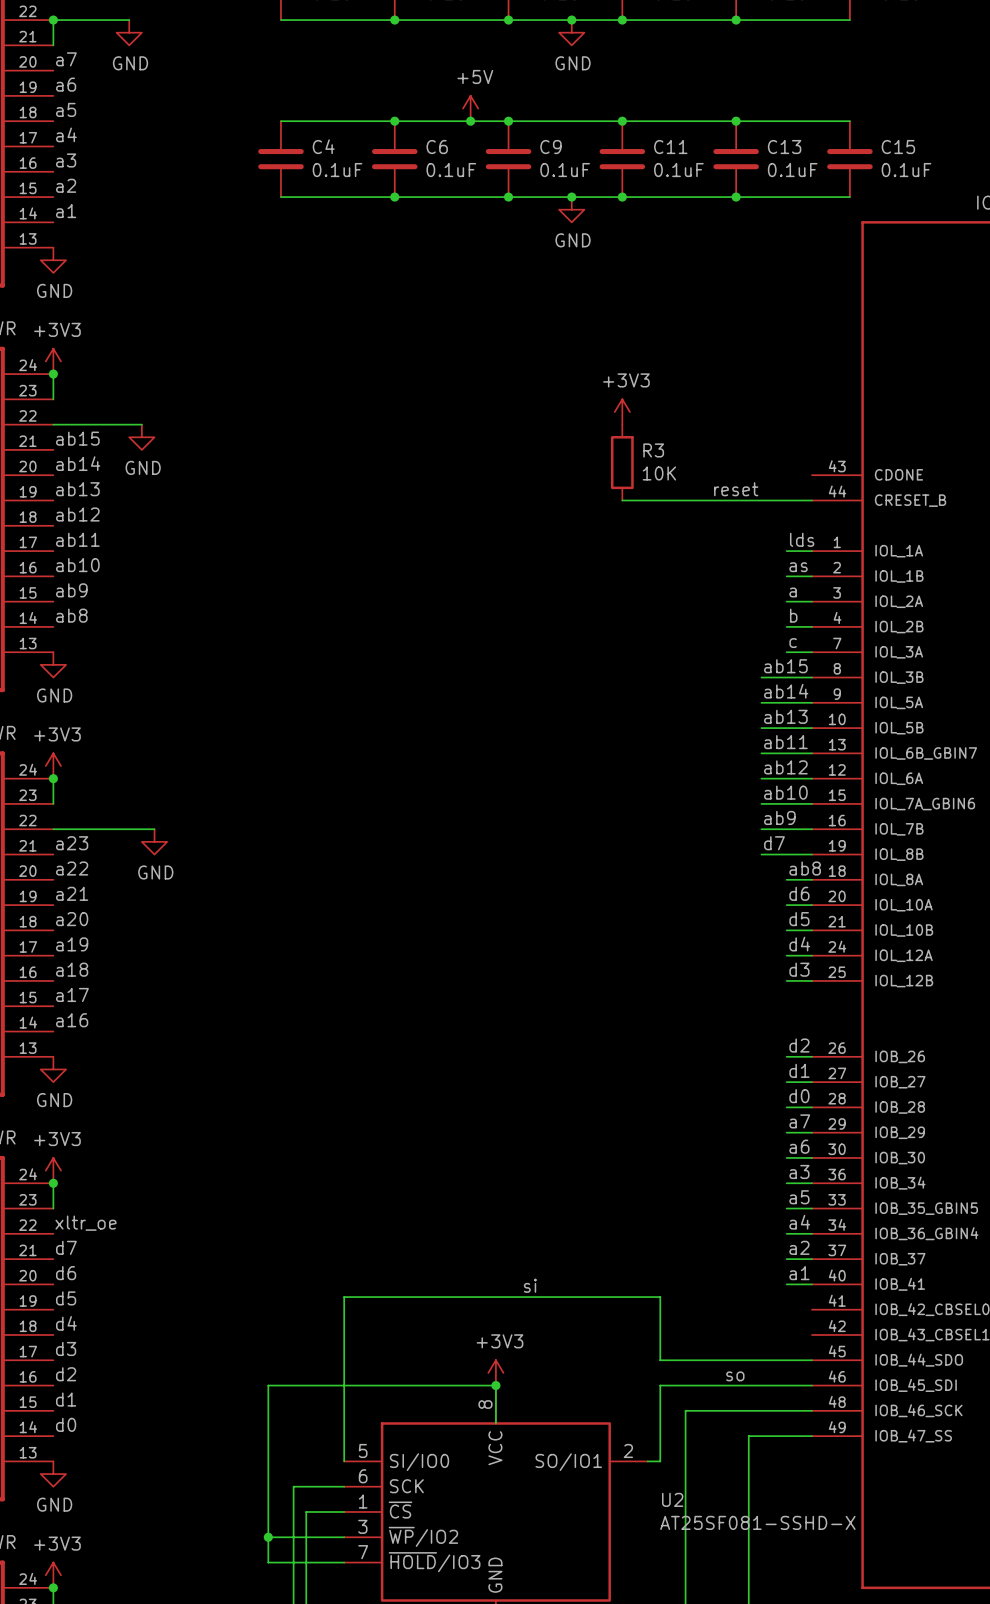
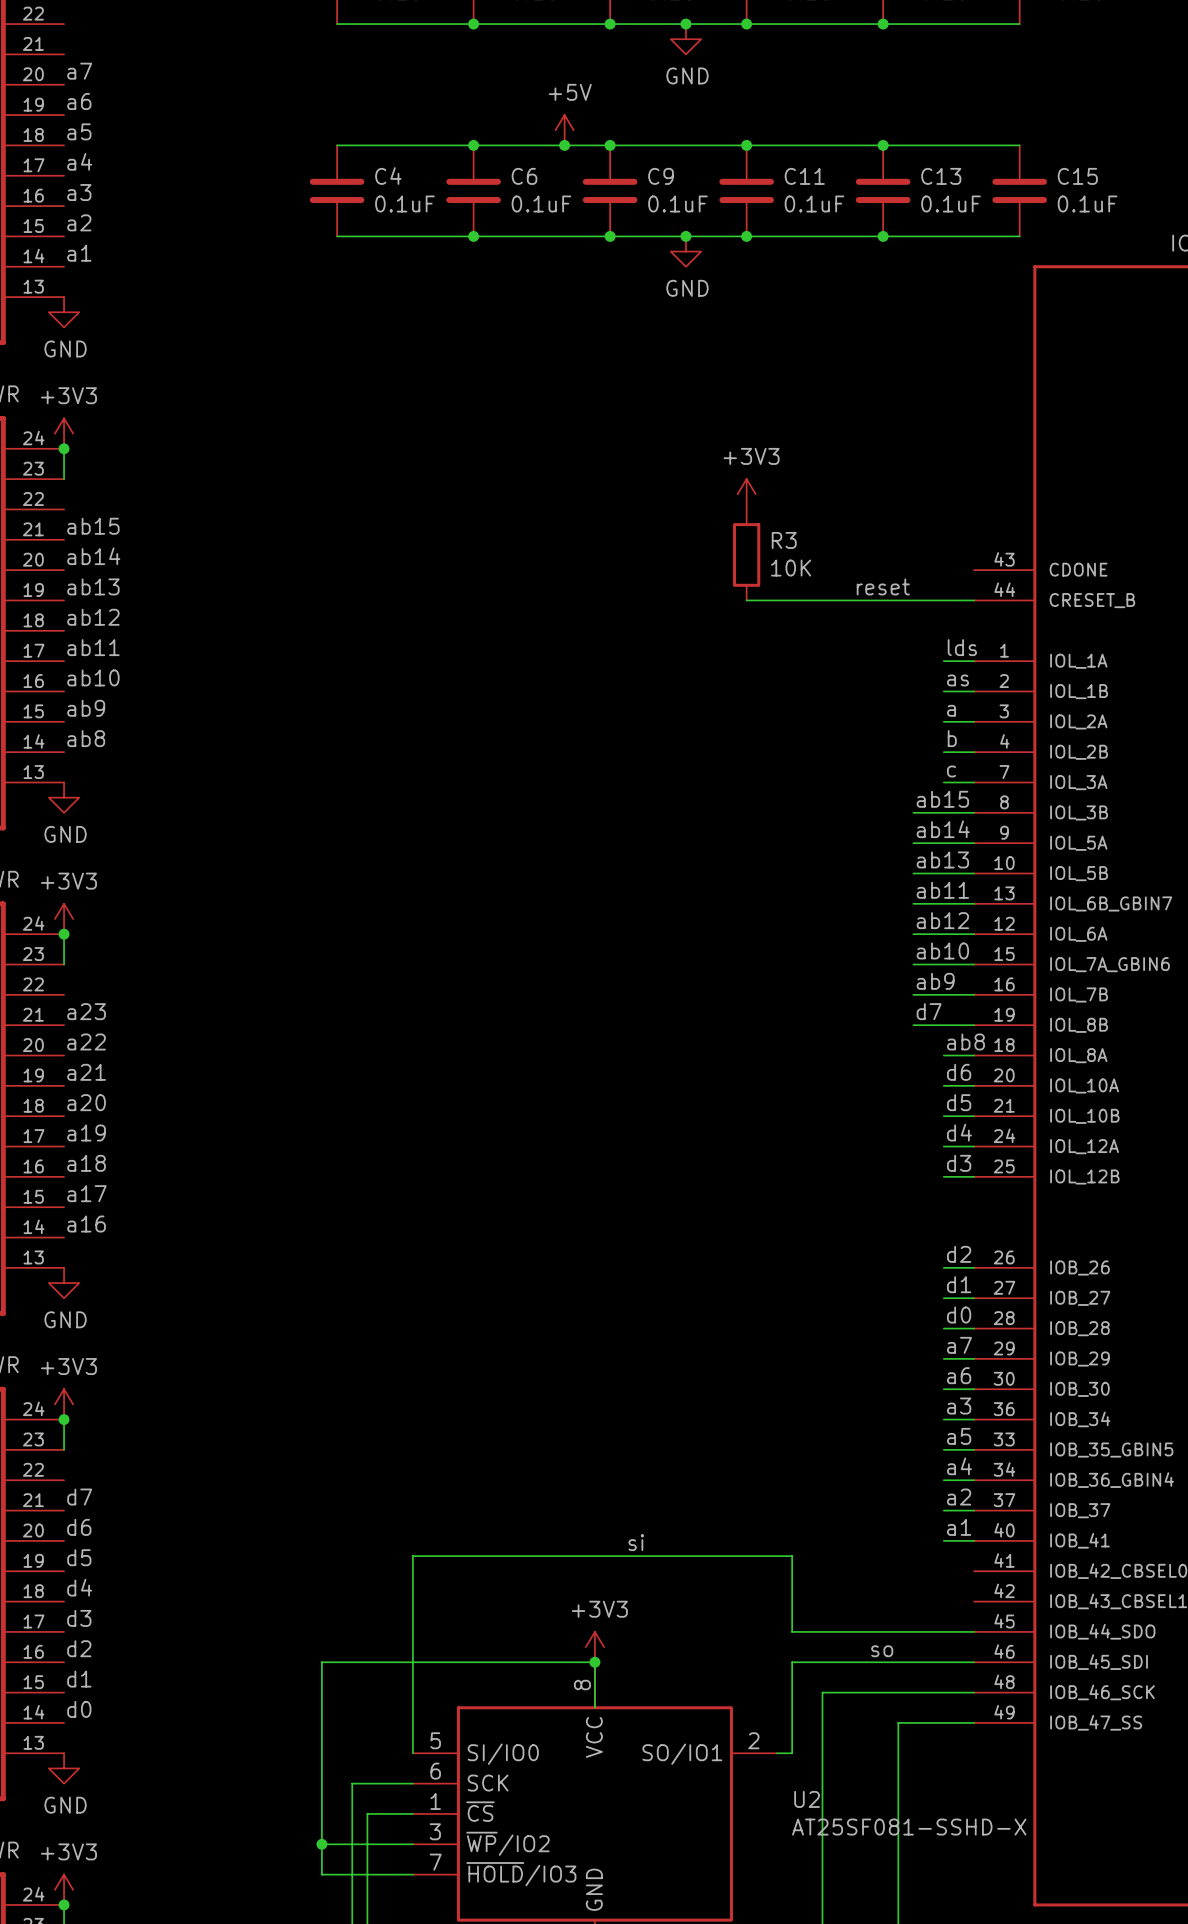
junction: (53, 20) -> none
wire: (129, 20) (53, 20) (53, 45) -> none
power symbol: GND (129, 32) -> none
wire: (53, 424) (141, 424) -> none
power symbol: GND (141, 437) -> none
wire: (53, 829) (154, 829) -> none
power symbol: GND (154, 841) -> none
label: xltr_oe (85, 1223) -> none

